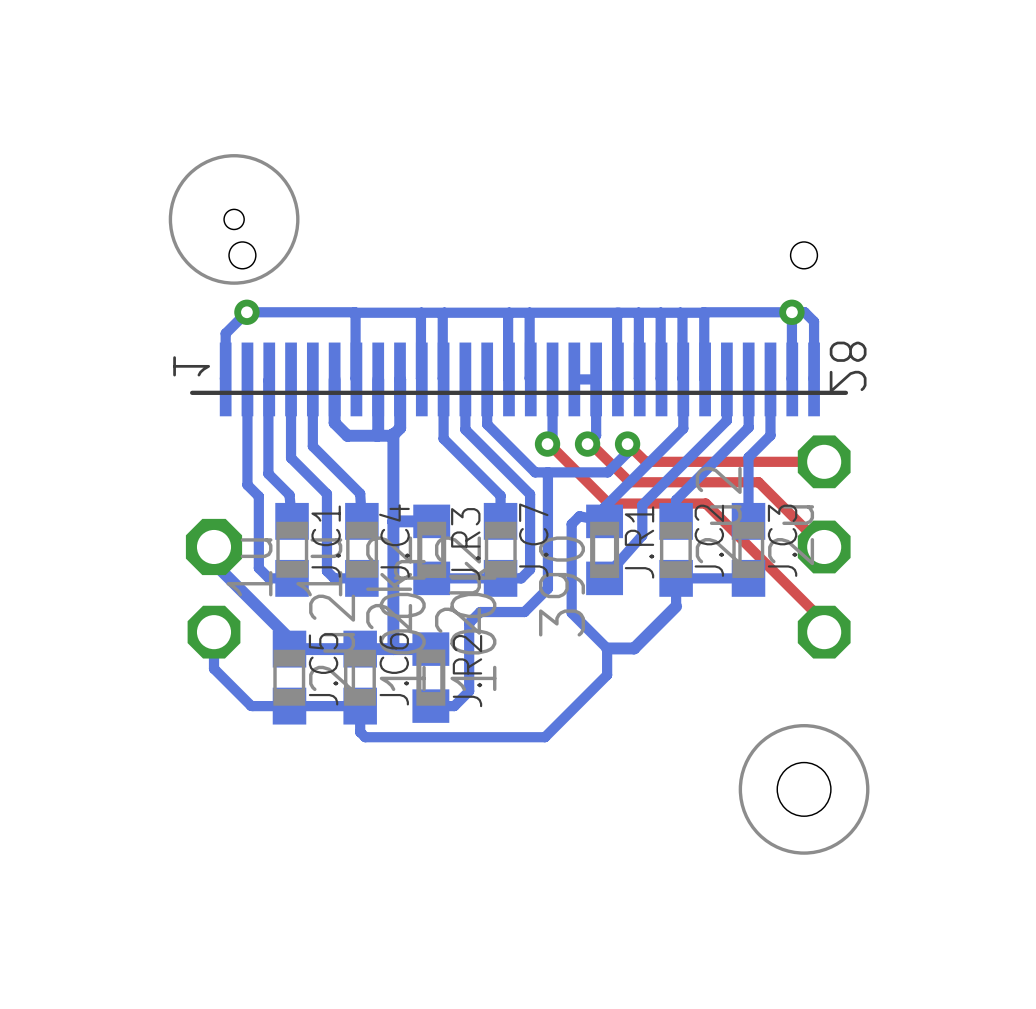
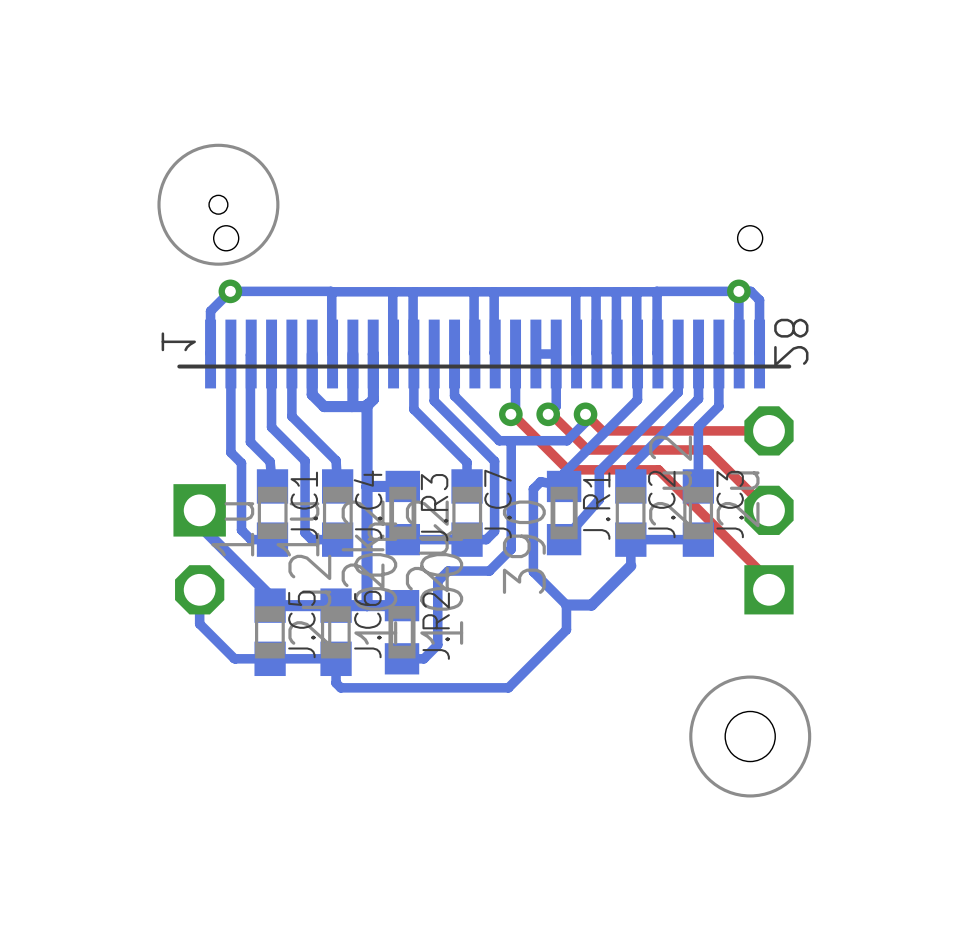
part footprint: [797, 435, 851, 659] -> [744, 406, 794, 615]
part footprint: [185, 518, 243, 659] -> [173, 484, 226, 615]

